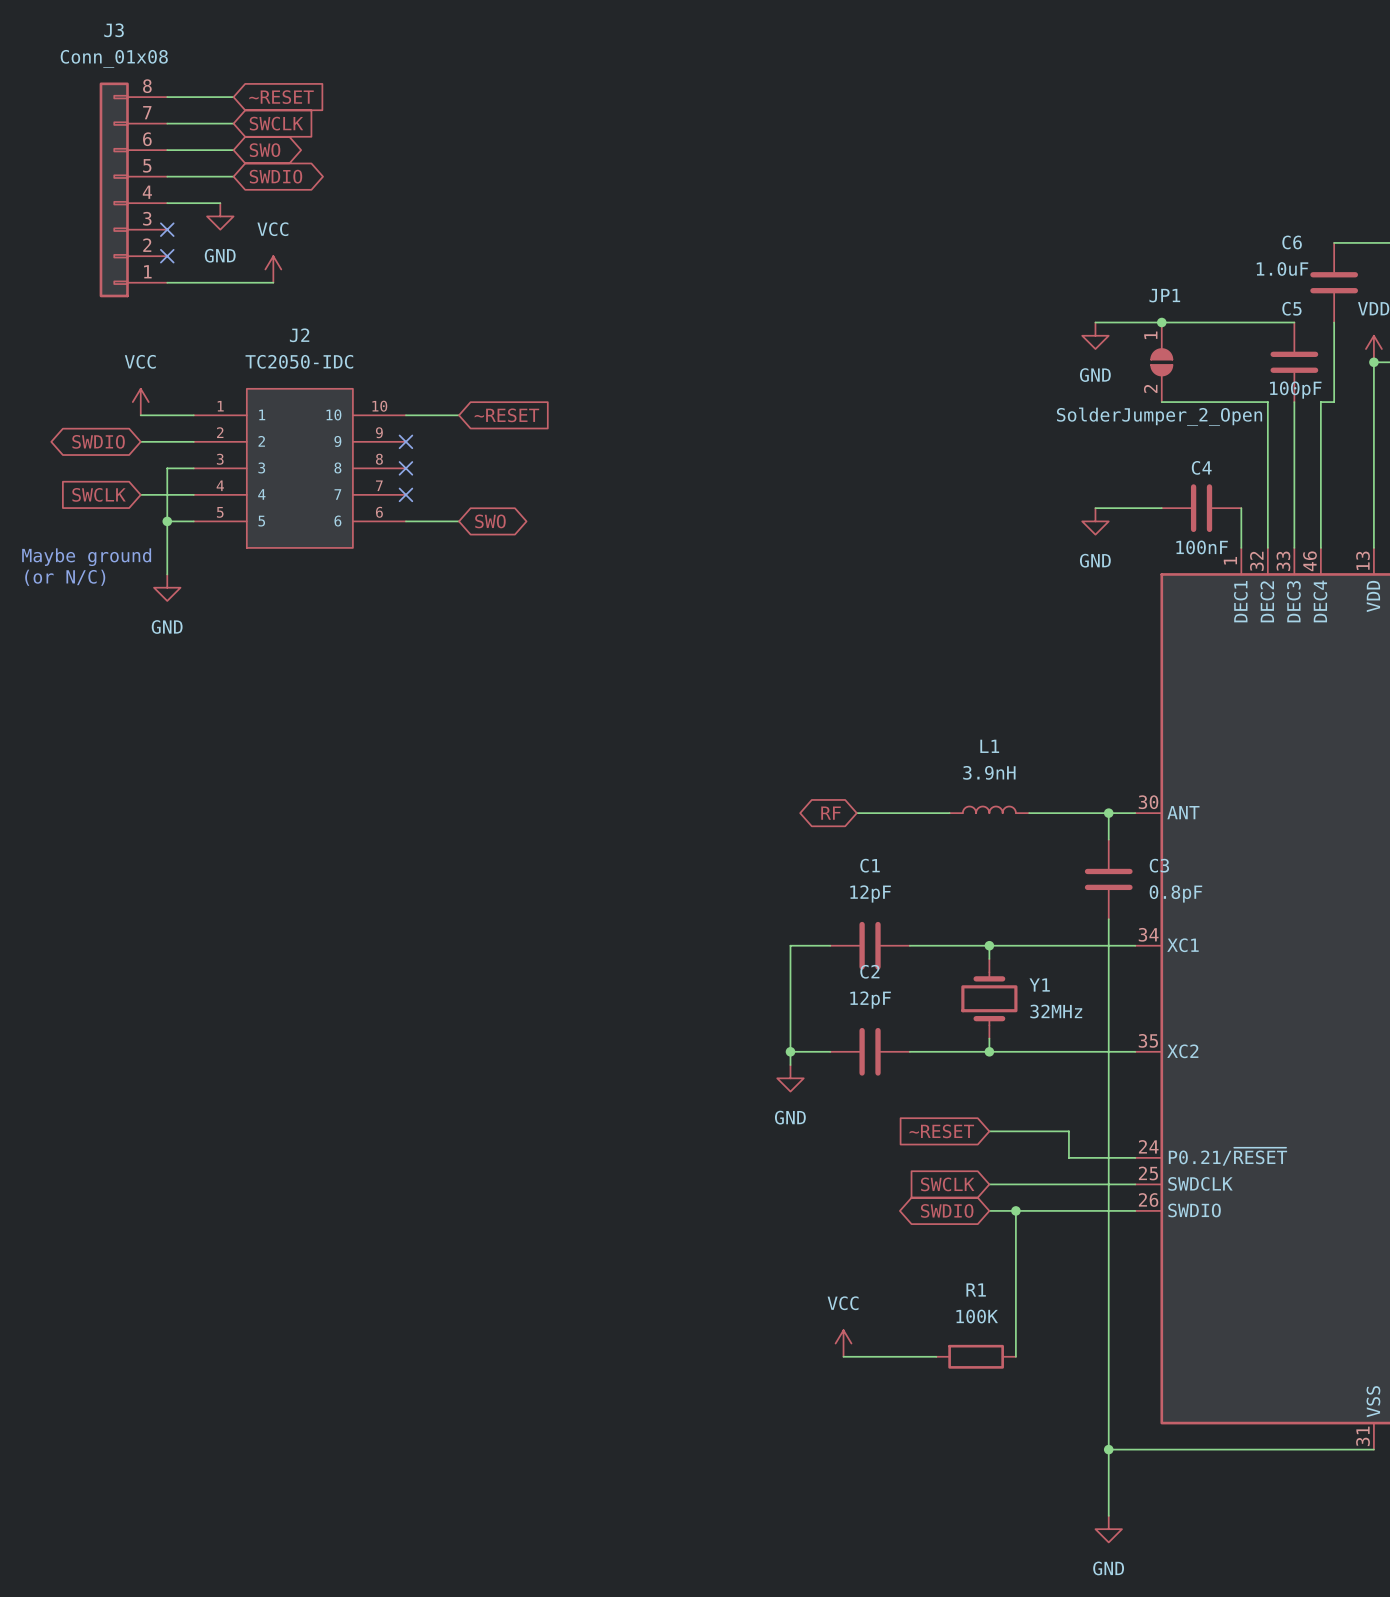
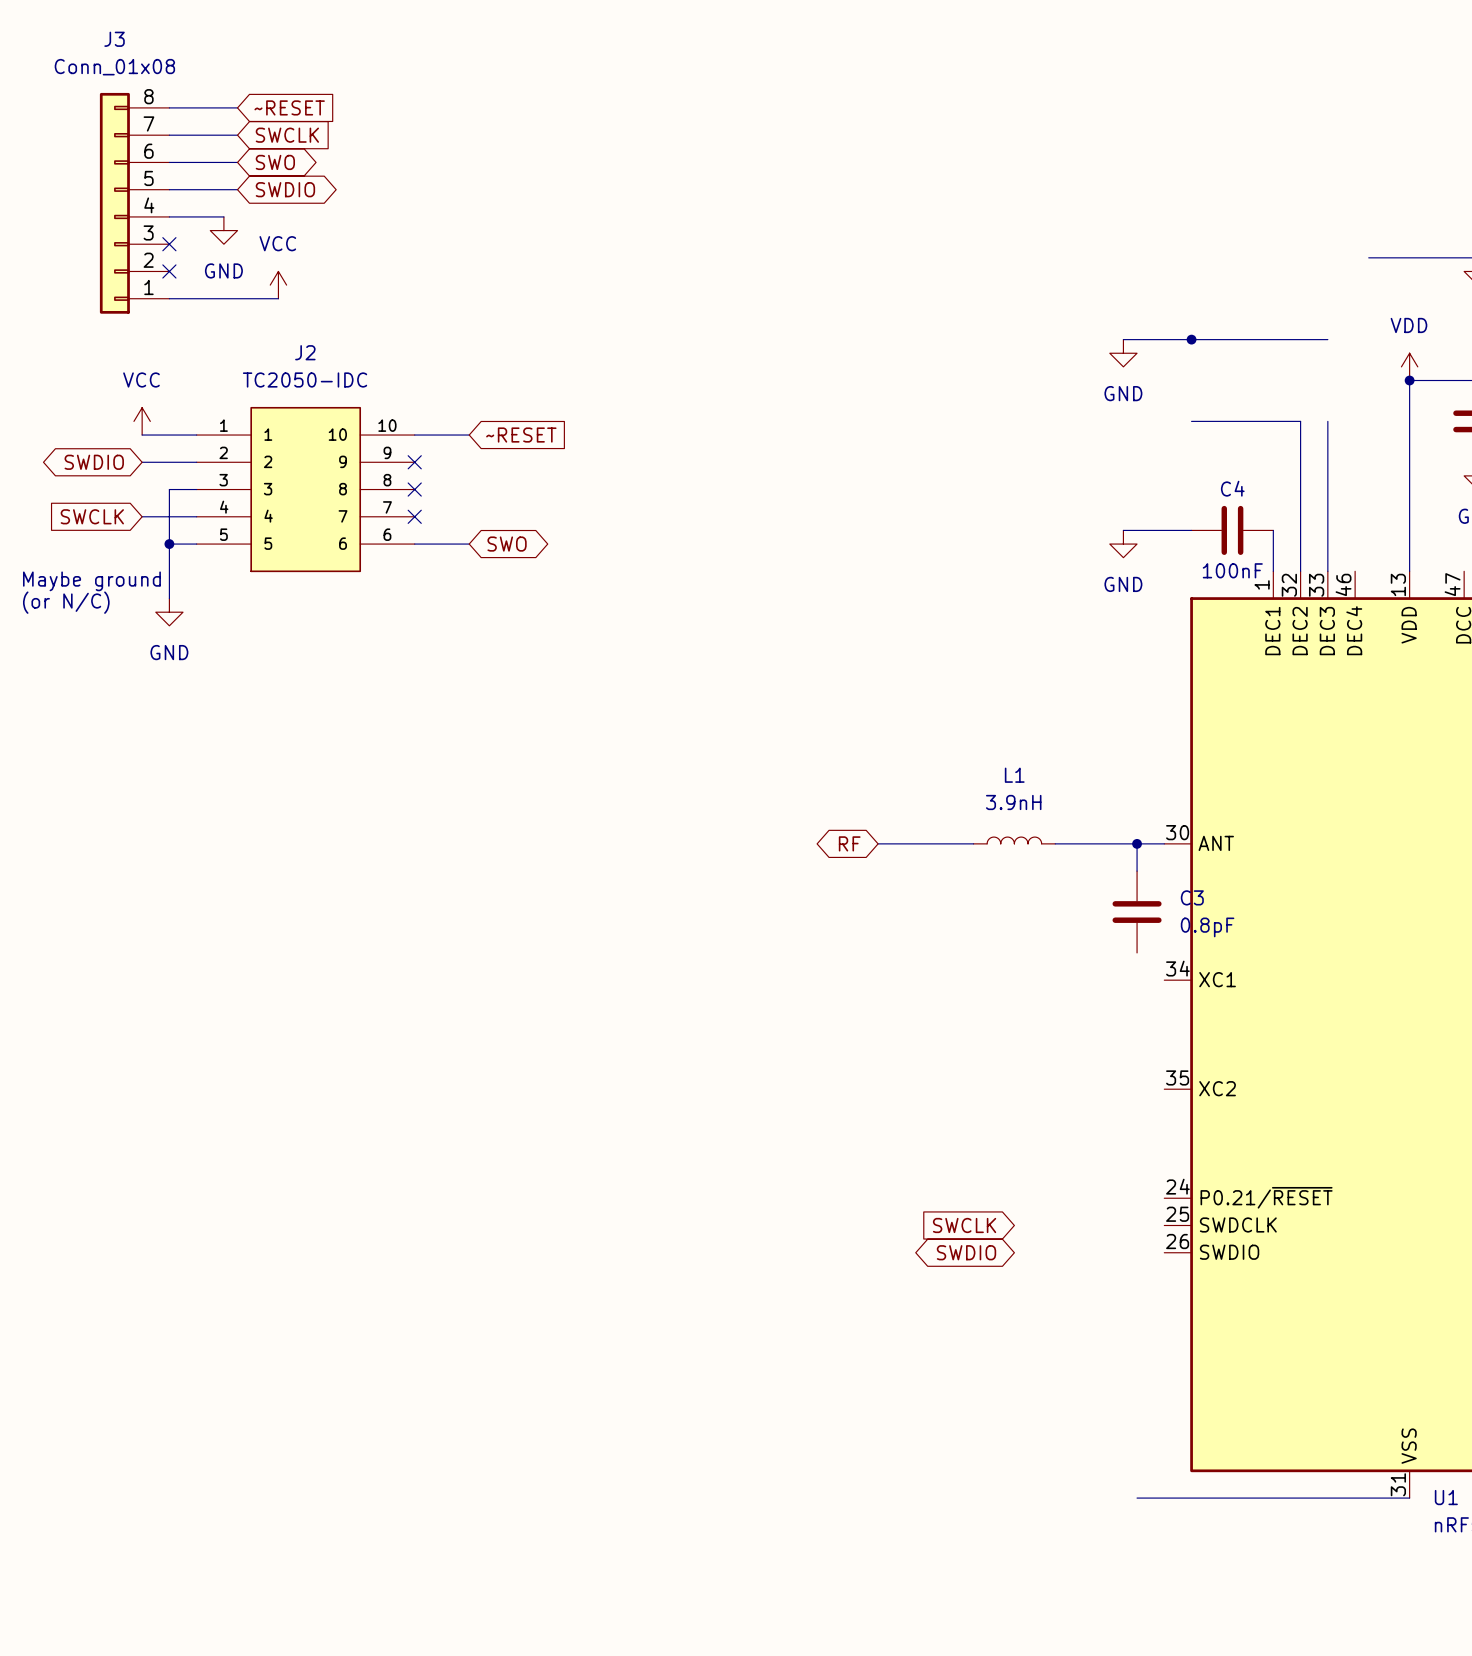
C6: 1.0uF (1334, 282) -> none
wire: (1334, 322) (1334, 402) (1320, 402) (1320, 547) -> none
JP1: SolderJumper_2_Open (1161, 362) -> none
C5: 100pF (1294, 362) -> none
wire: (1108, 919) (1108, 1515) -> none
wire: (830, 945) (790, 945) (790, 1065) -> none
C1: 12pF (870, 945) -> none
wire: (909, 945) (1135, 945) -> none
wire: (989, 945) (989, 958) -> none
junction: (989, 945) -> none
Y1: 32MHz (989, 998) -> none
wire: (989, 1038) (989, 1051) -> none
wire: (790, 1051) (830, 1051) -> none
junction: (790, 1051) -> none
C2: 12pF (870, 1051) -> none
wire: (909, 1051) (1135, 1051) -> none
junction: (989, 1051) -> none
power symbol: GND (790, 1078) -> none
global label: ~RESET (941, 1131) -> none
wire: (989, 1131) (1068, 1131) (1068, 1157) (1135, 1157) -> none
wire: (989, 1184) (1135, 1184) -> none
wire: (989, 1210) (1135, 1210) -> none
wire: (1015, 1210) (1015, 1356) -> none
junction: (1015, 1210) -> none
power symbol: VCC (843, 1343) -> none
wire: (843, 1356) (936, 1356) -> none
R1: 100K (976, 1356) -> none
junction: (1108, 1449) -> none
power symbol: GND (1108, 1529) -> none

